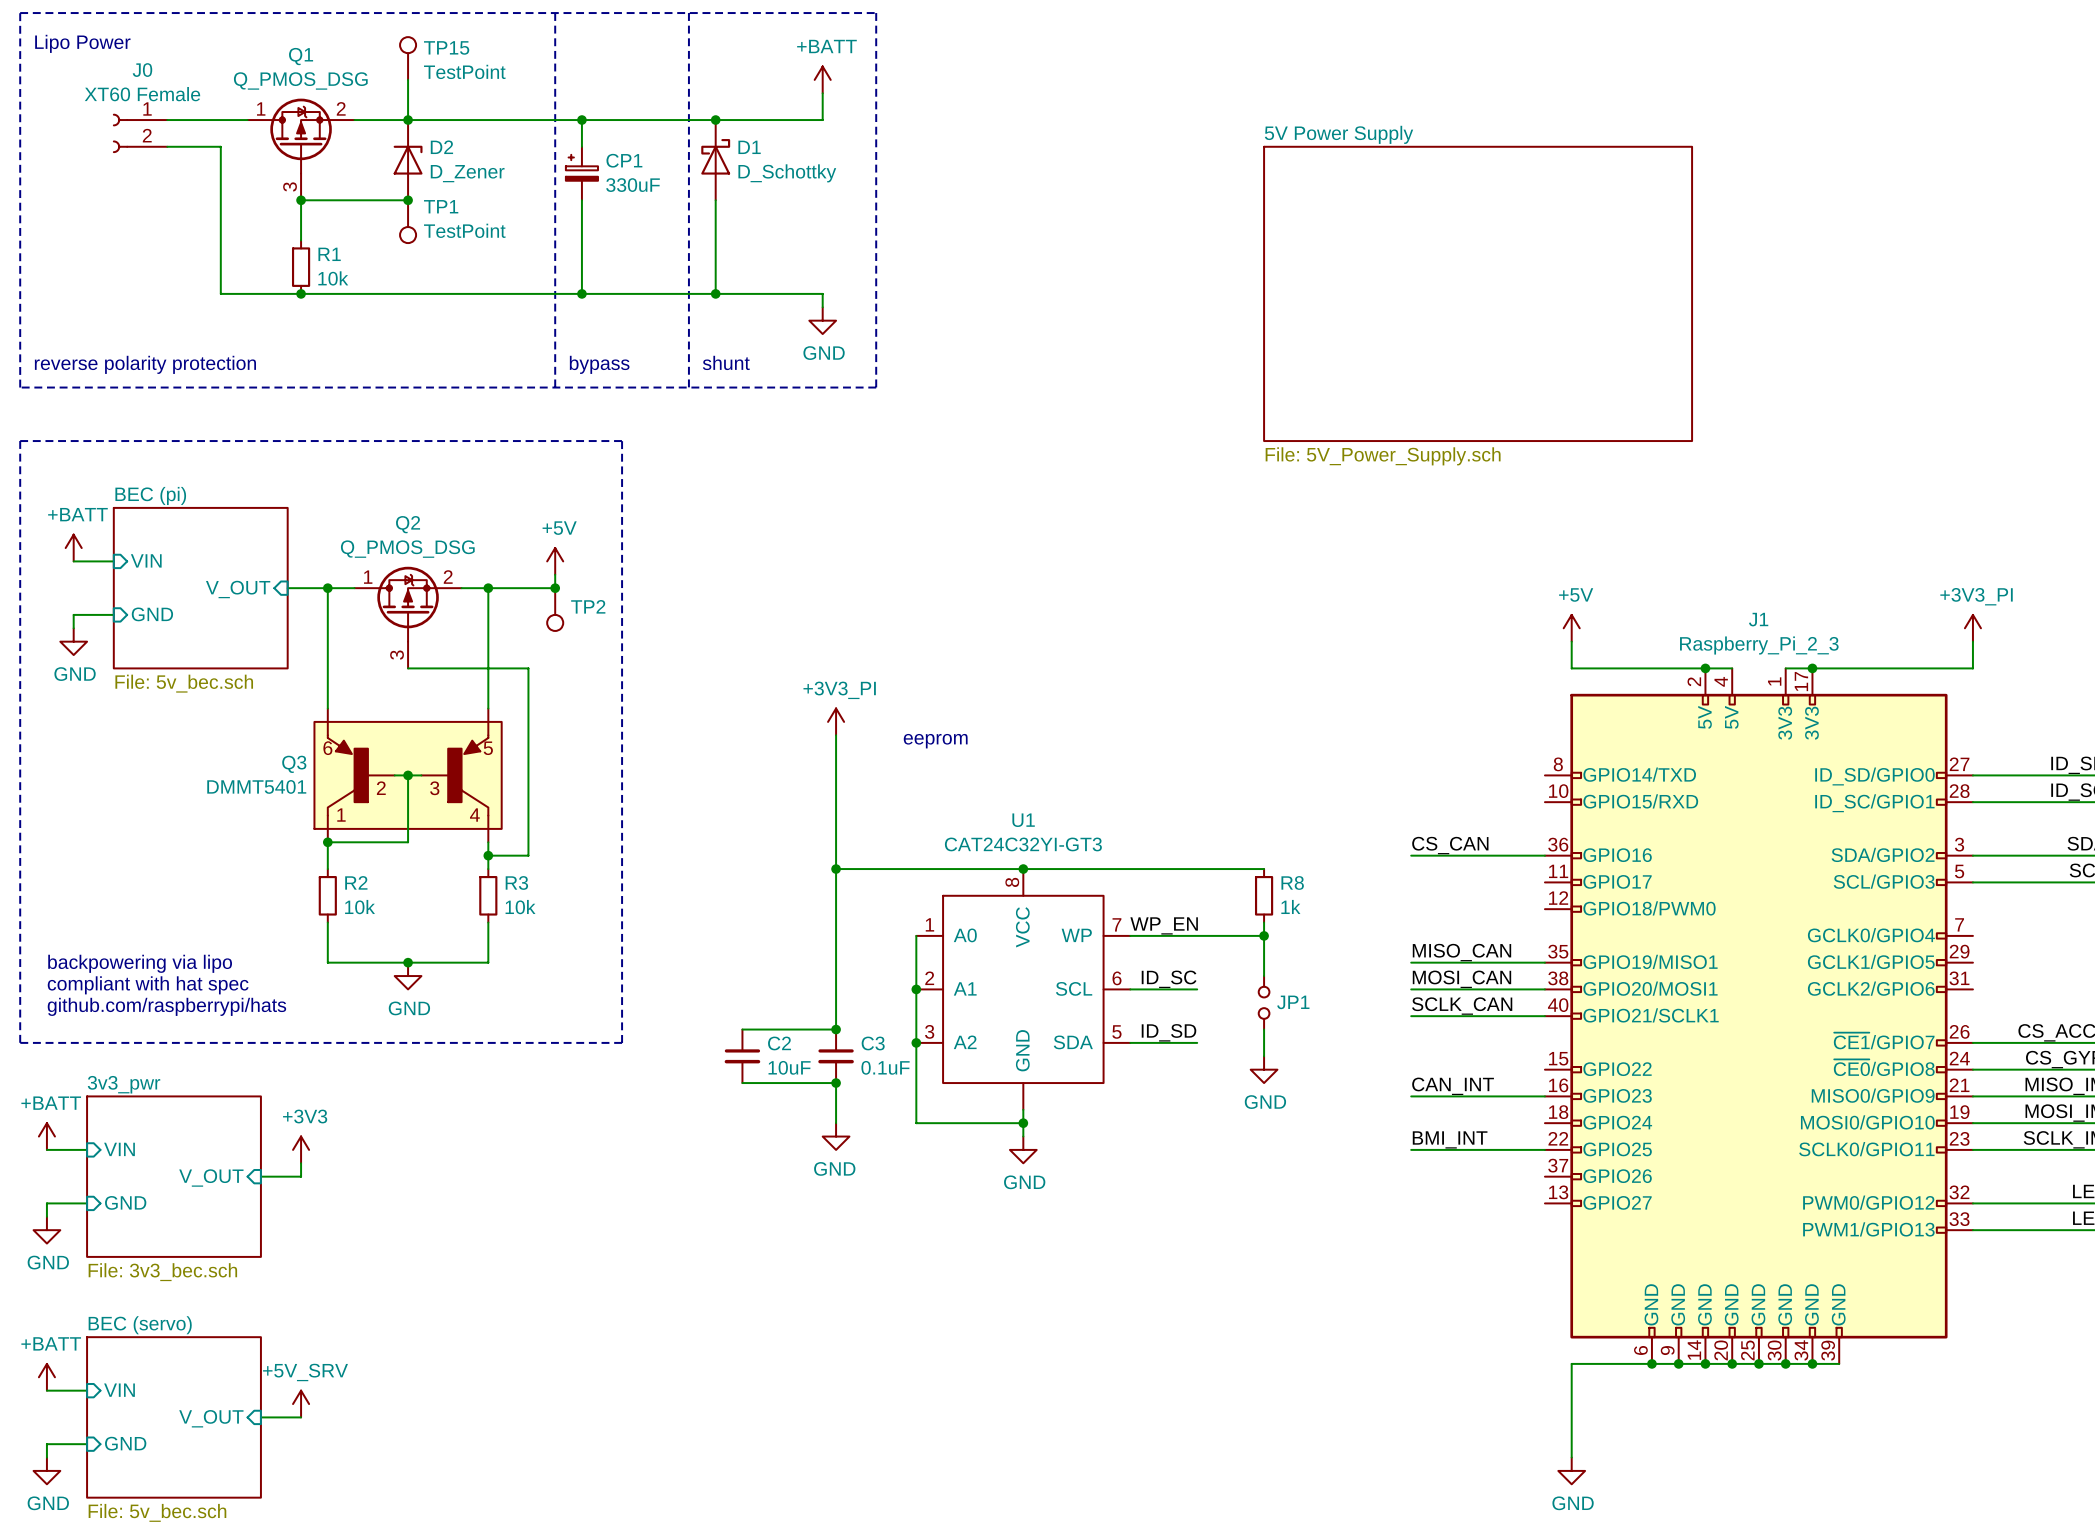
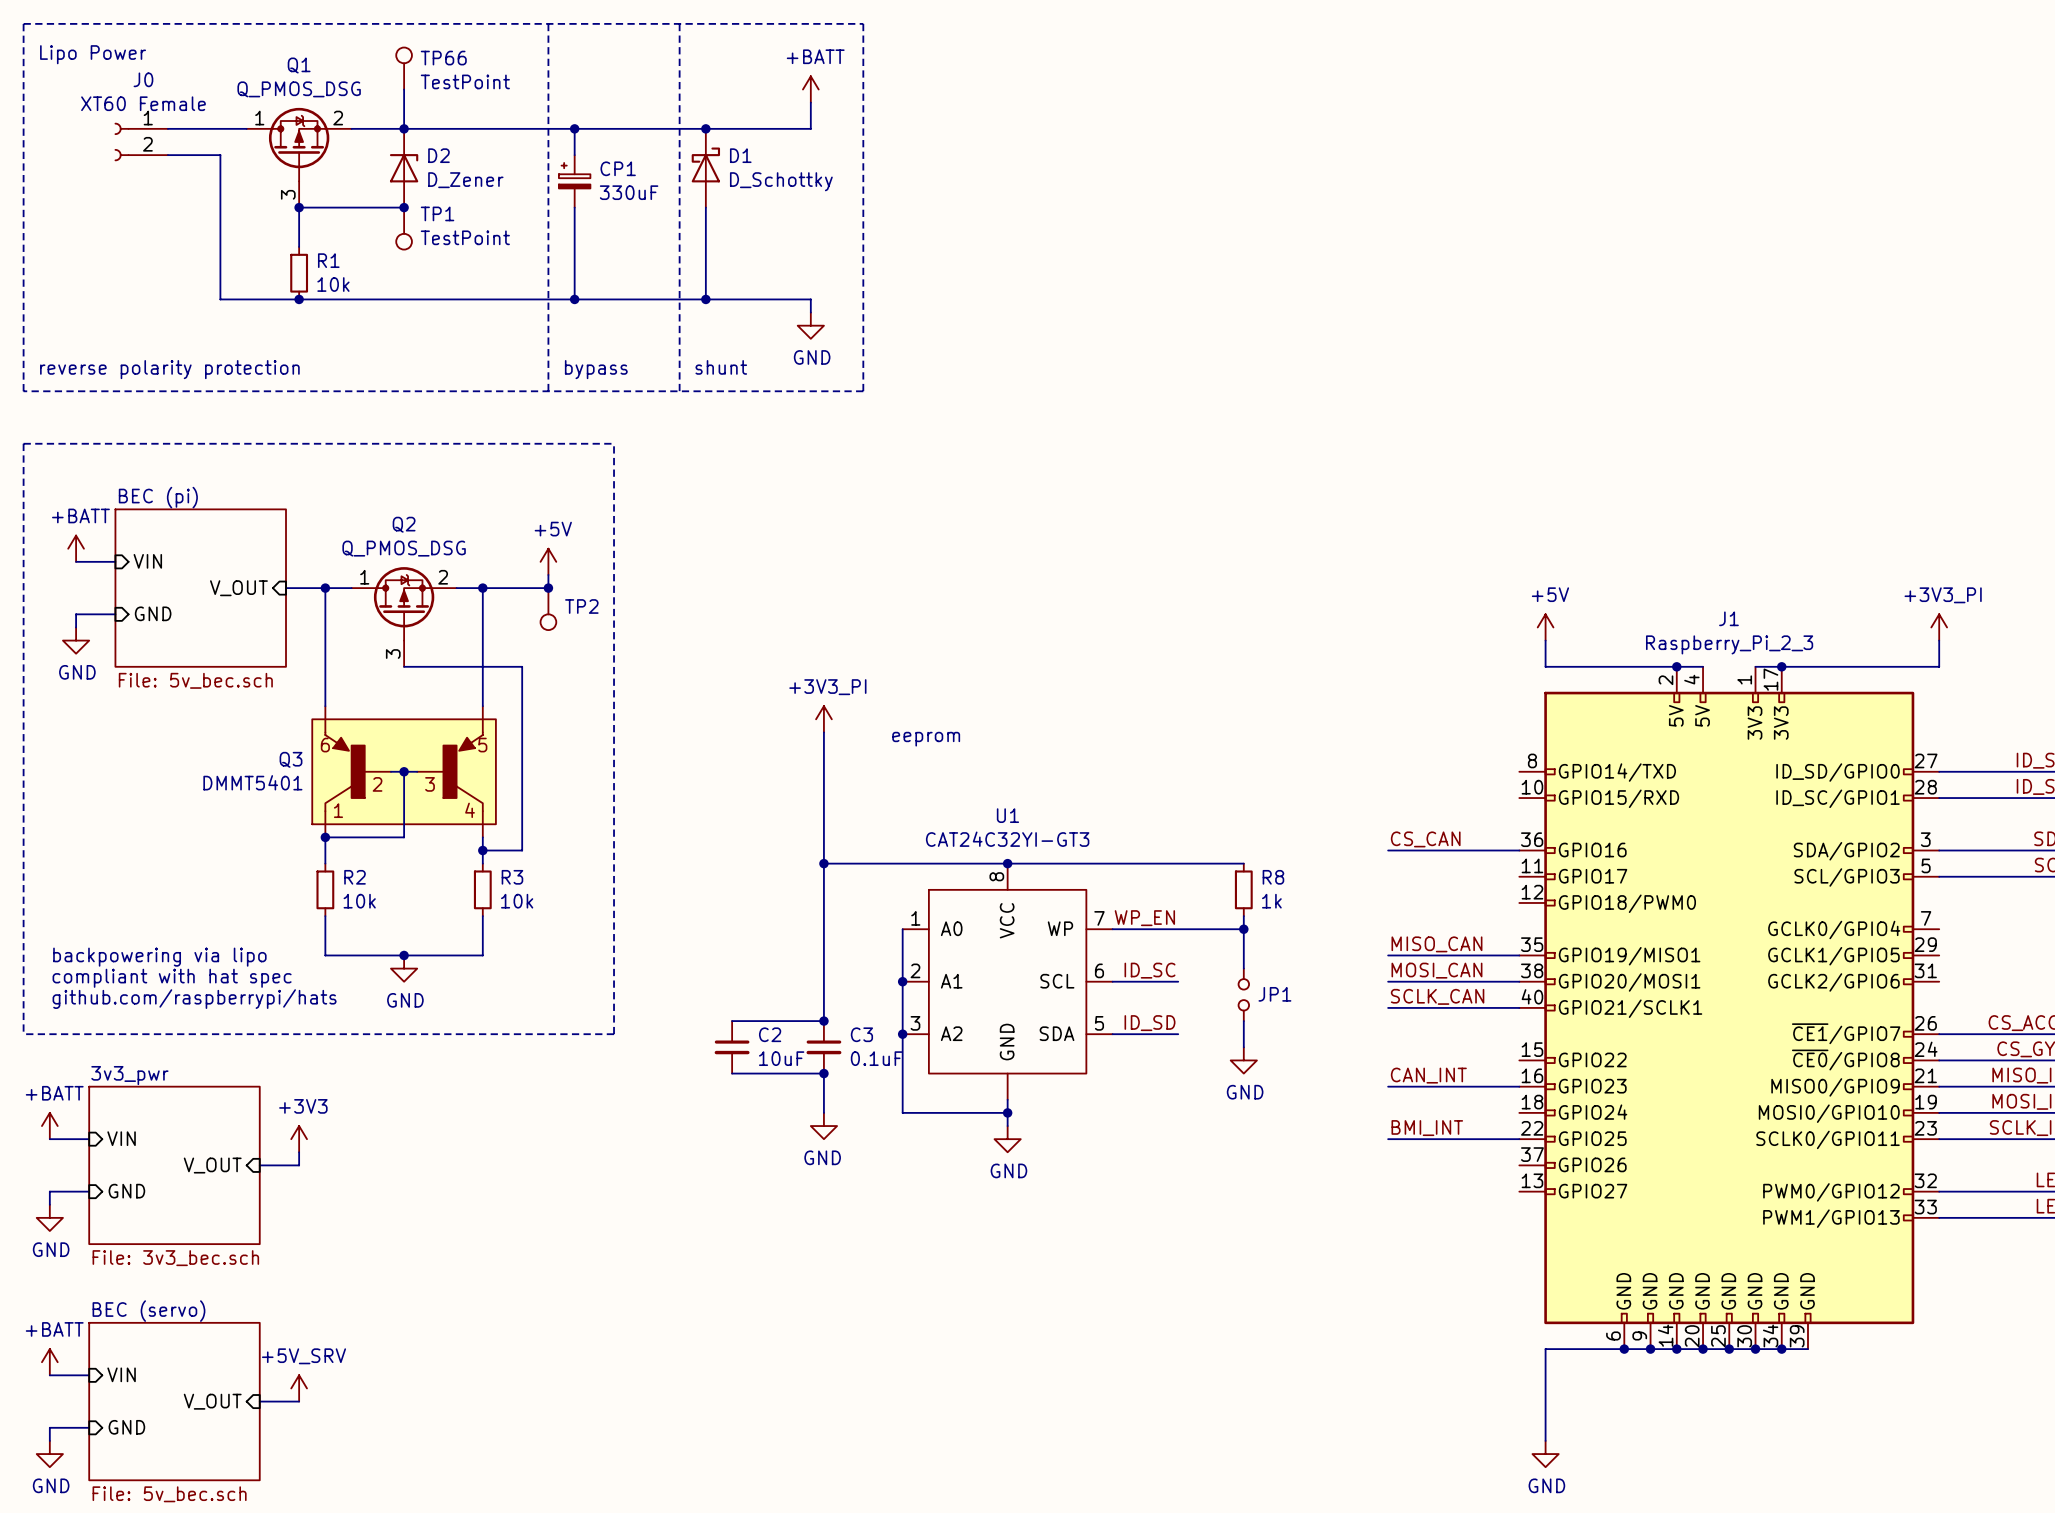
TP15 name: TP15 (446, 47) -> TP66 (443, 58)
sheet 5V Power Supply: File: 5V_Power_Supply.sch (1478, 293) -> none

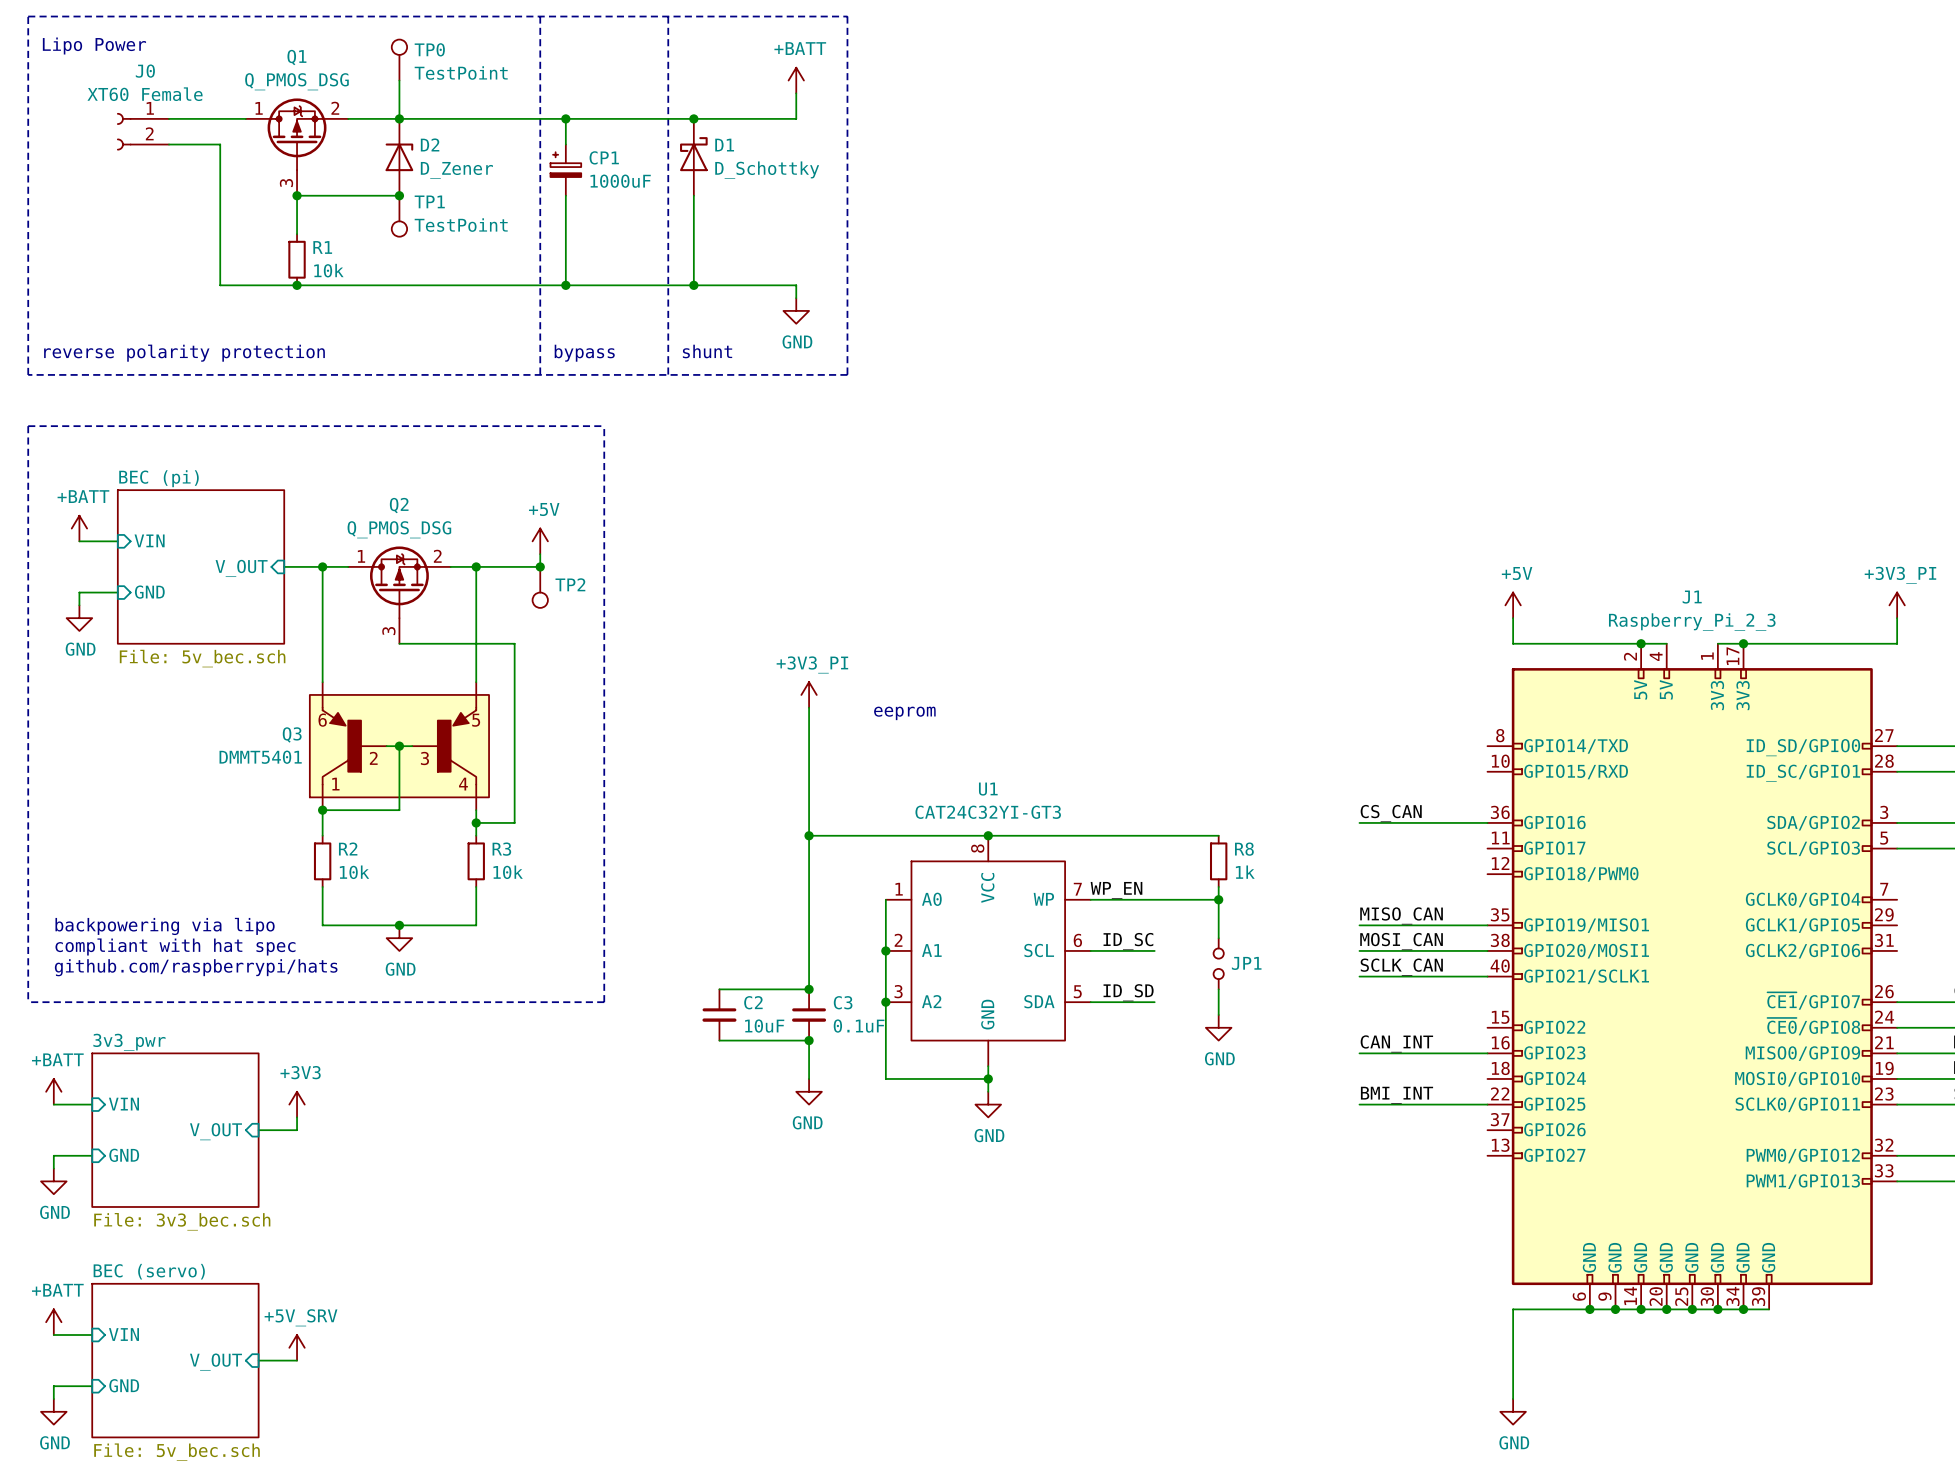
TP66 name: TP66 (443, 58) -> TP0 (429, 49)
CP1 value: 330uF (629, 192) -> 1000uF (620, 181)

